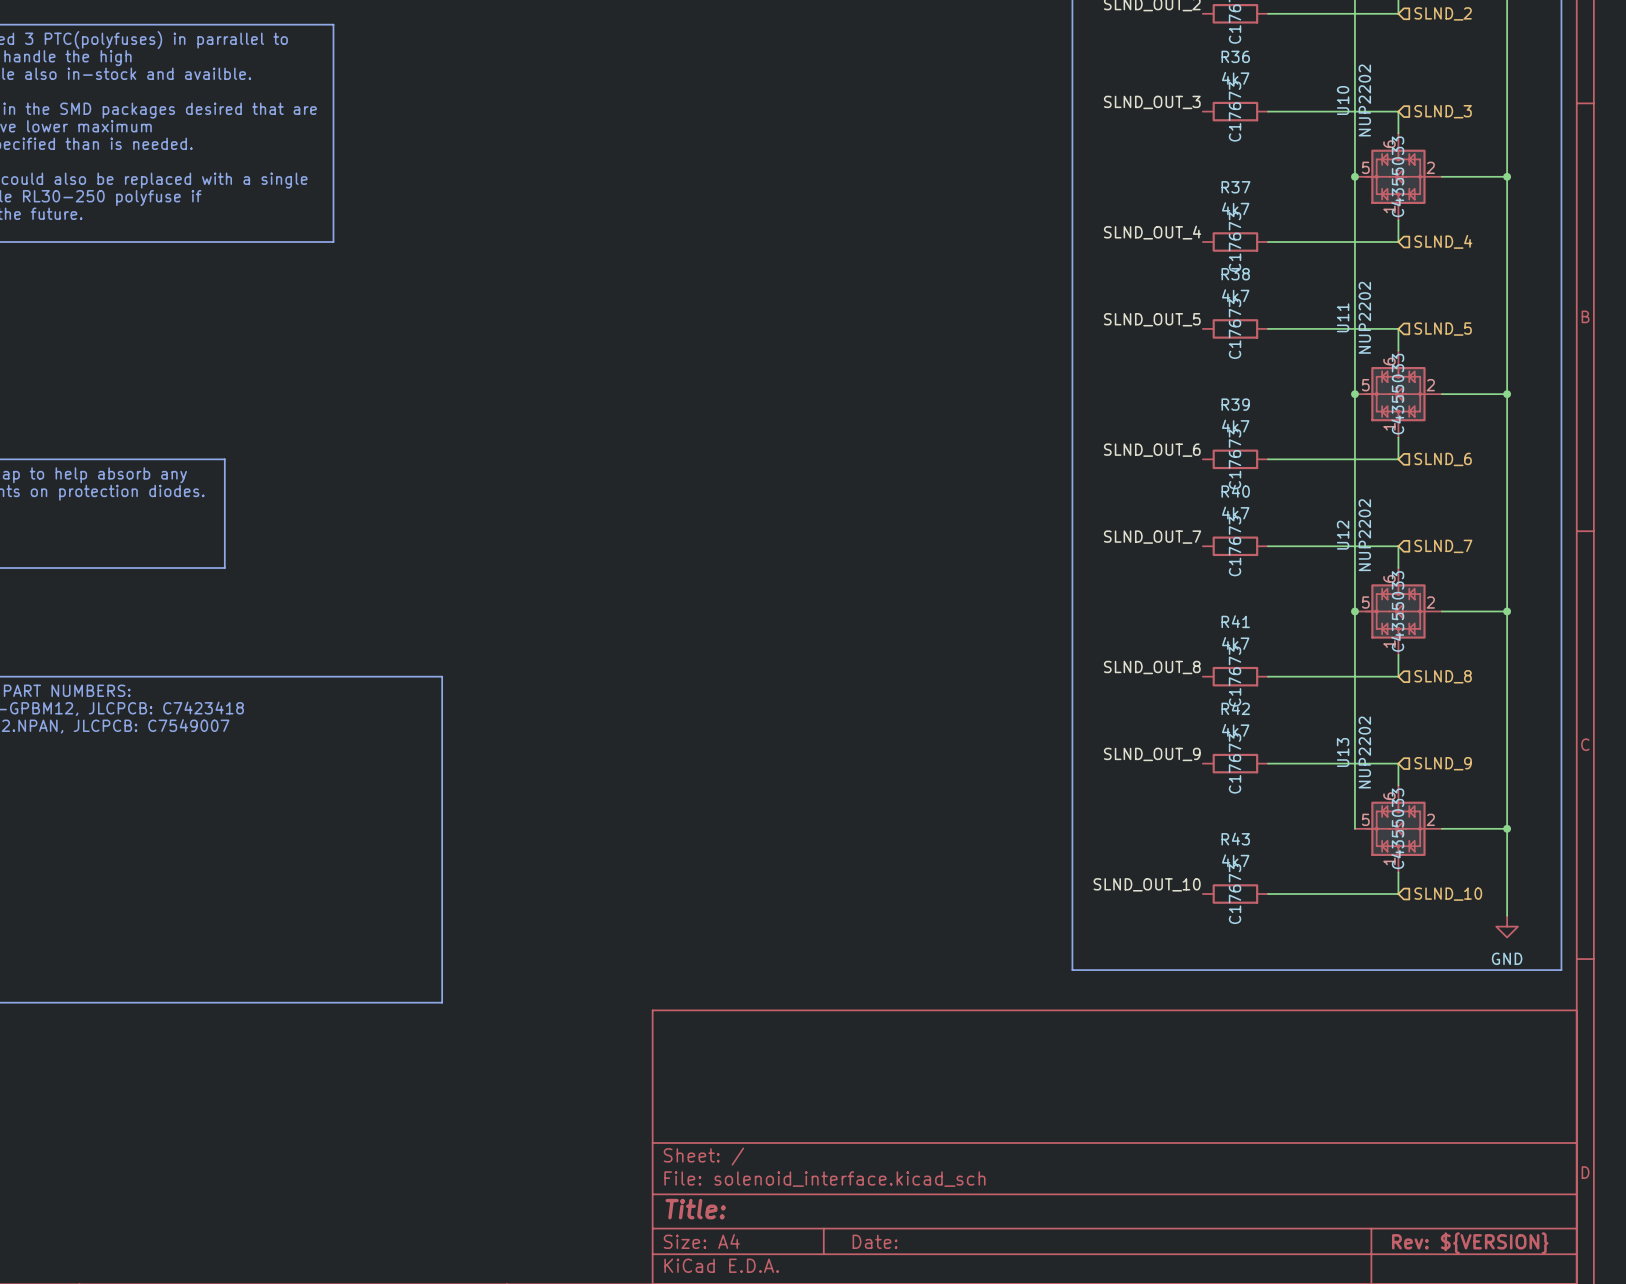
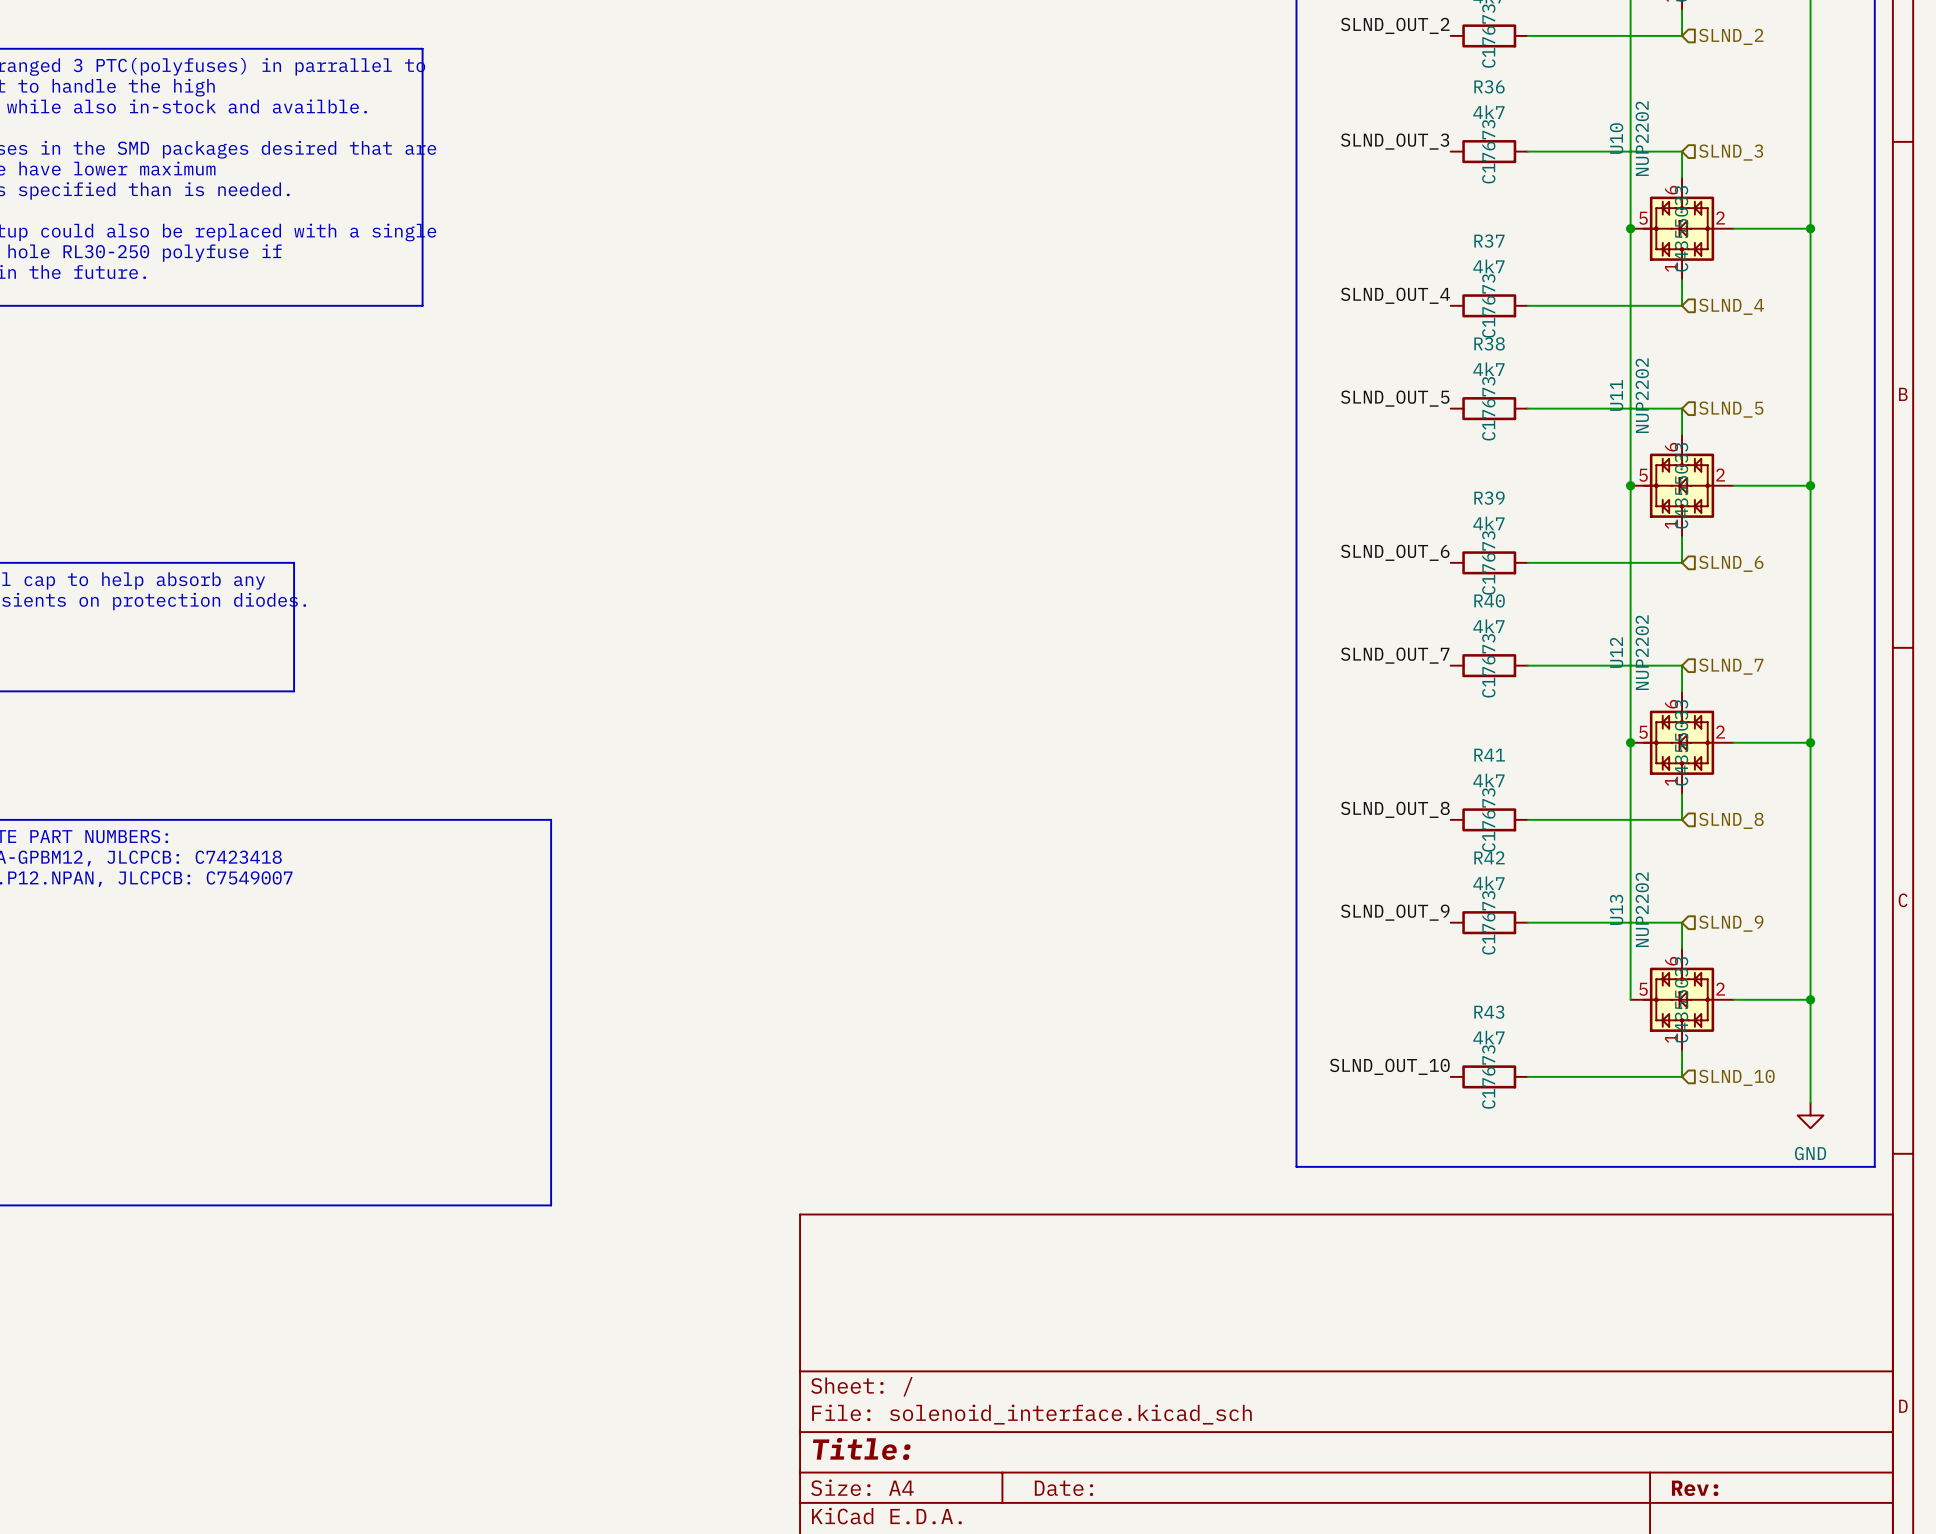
title block: Rev: ${VERSION} (1470, 1243) -> Rev: (1695, 1488)

